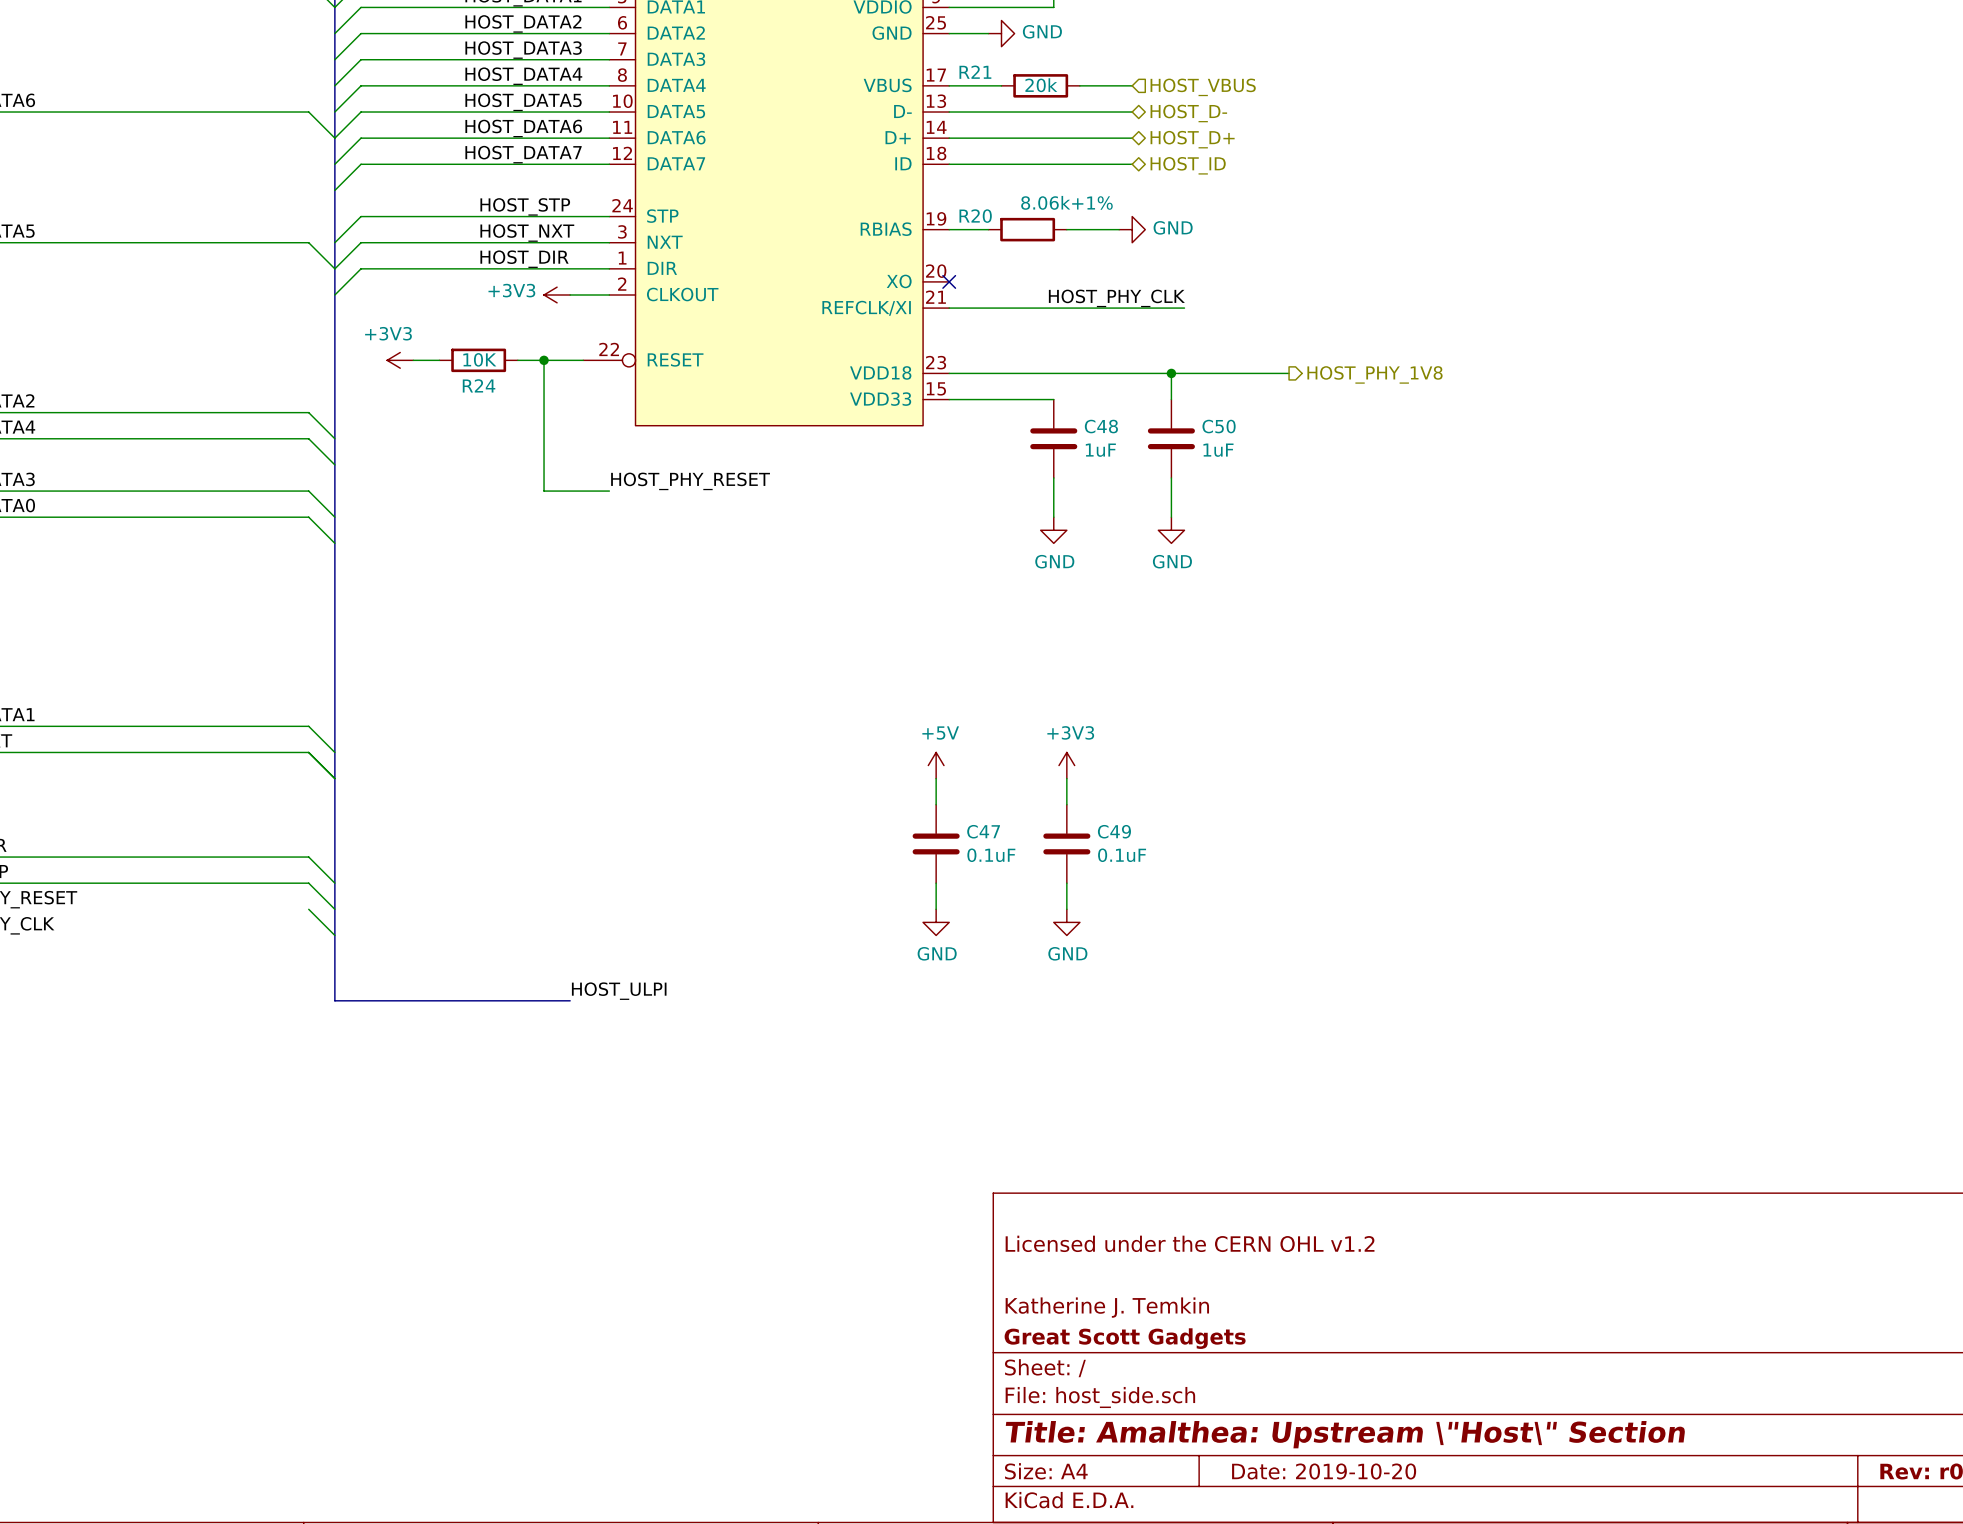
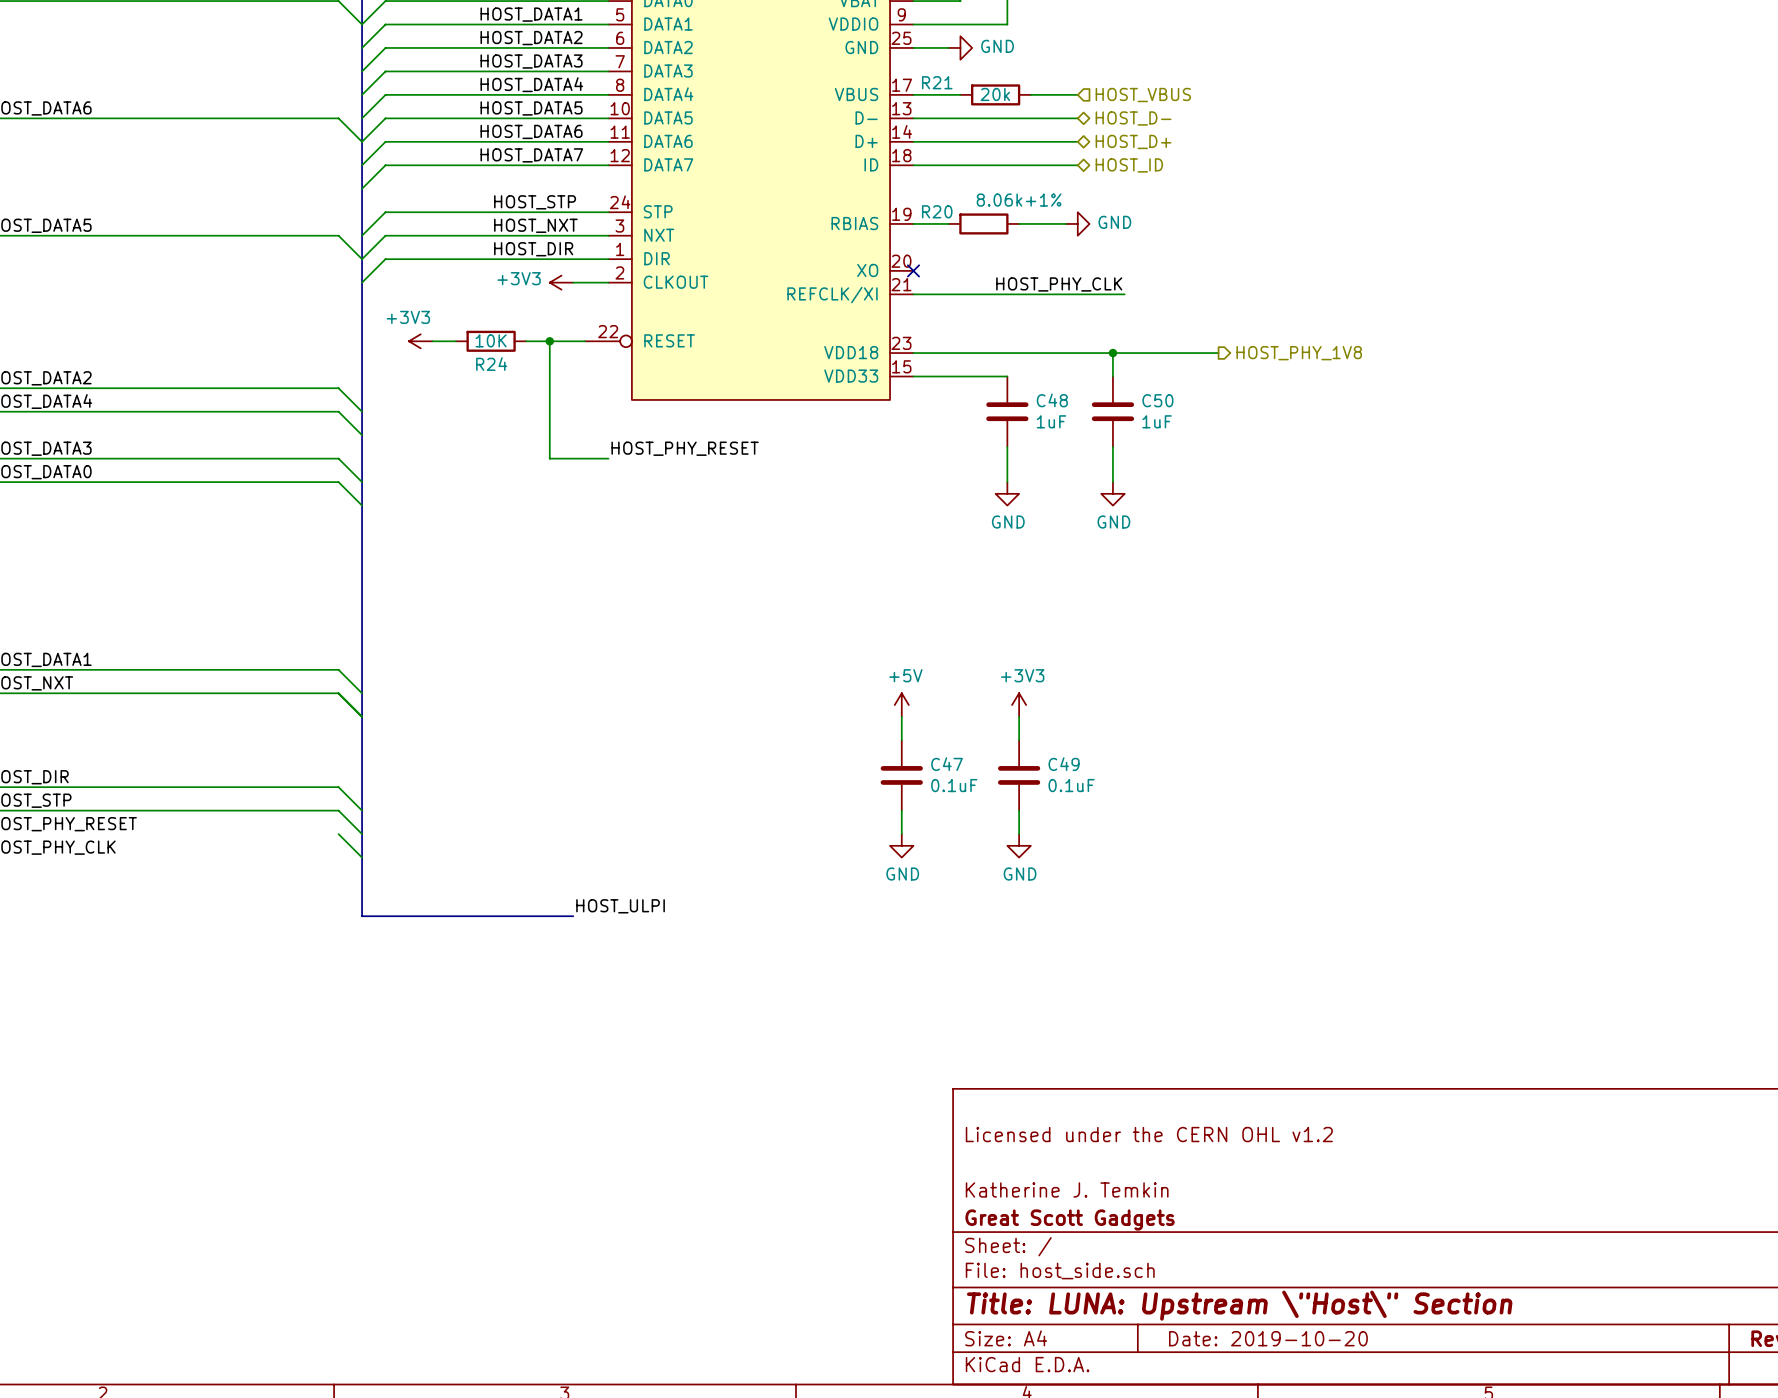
title block: Title: Amalthea: Upstream \"Host\" Section (1345, 1434) -> Title: LUNA: Upstream \"Host\" Section (1239, 1305)

